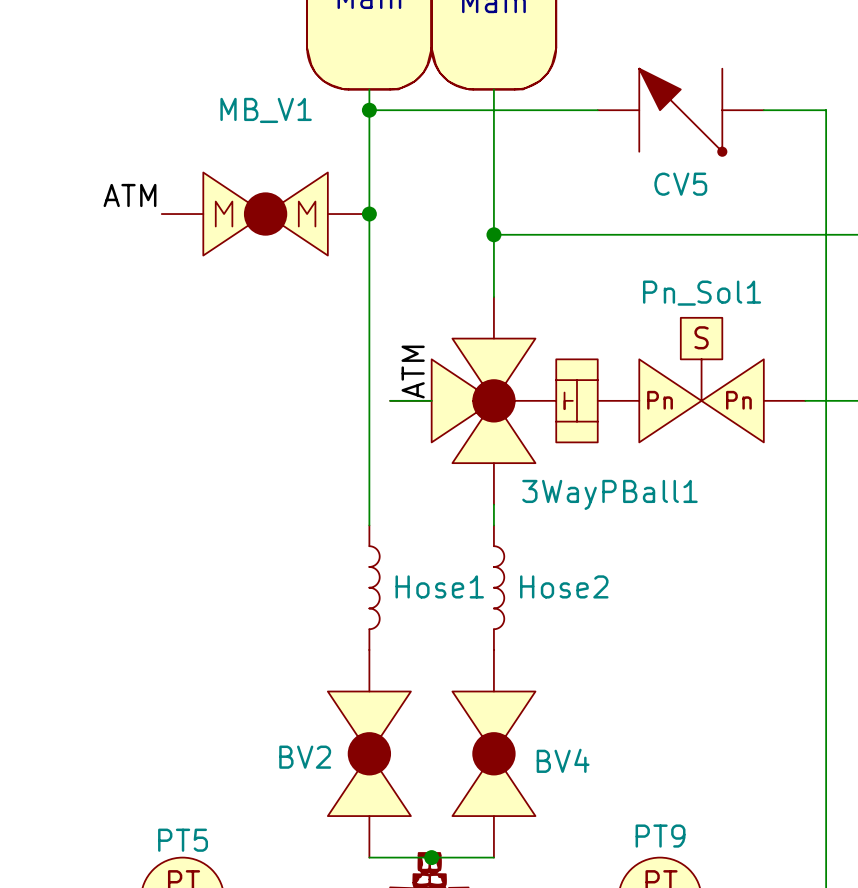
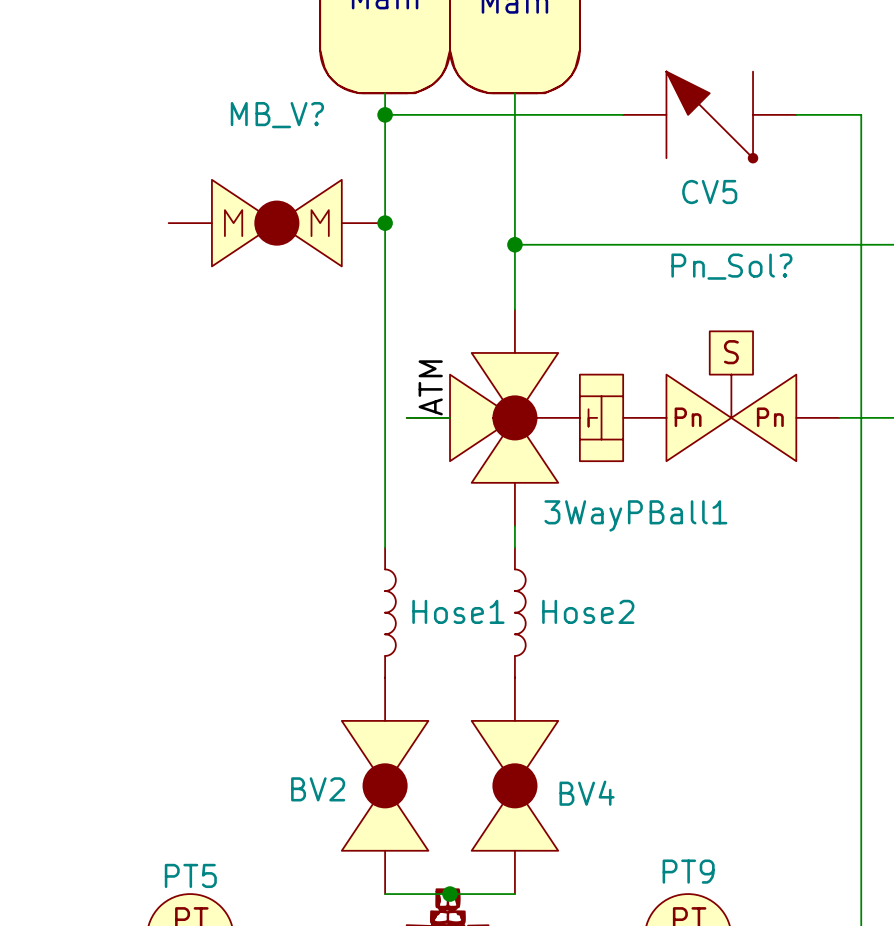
MB_V1 name: MB_V1 (266, 110) -> MB_V? (277, 115)
label: ATM (129, 195) -> none
Pn_Sol1 name: Pn_Sol1 (702, 293) -> Pn_Sol? (731, 266)

